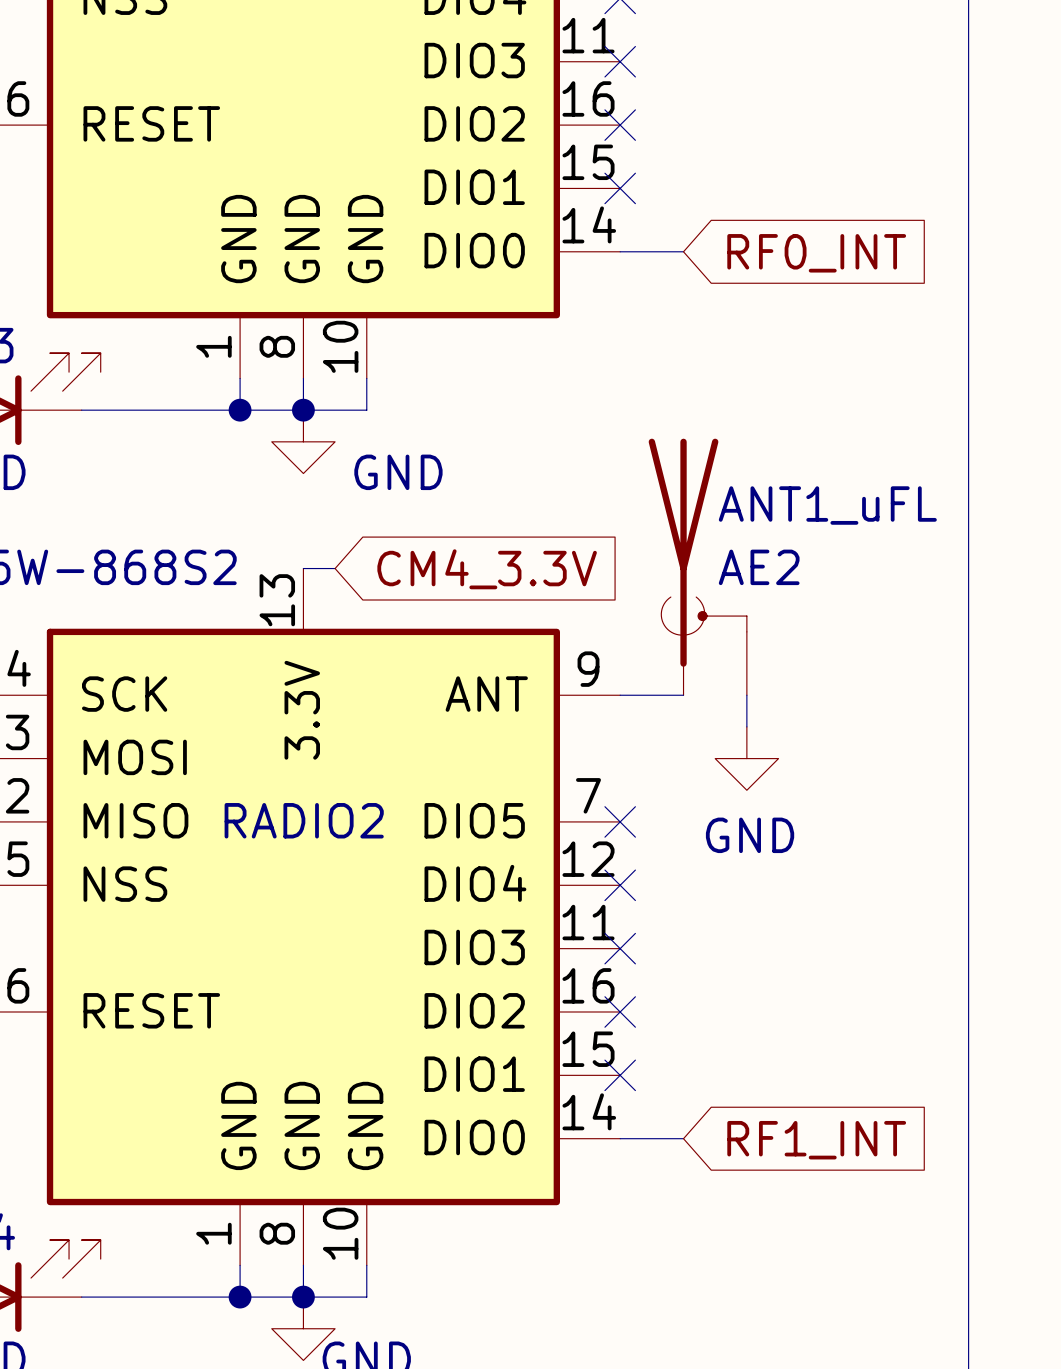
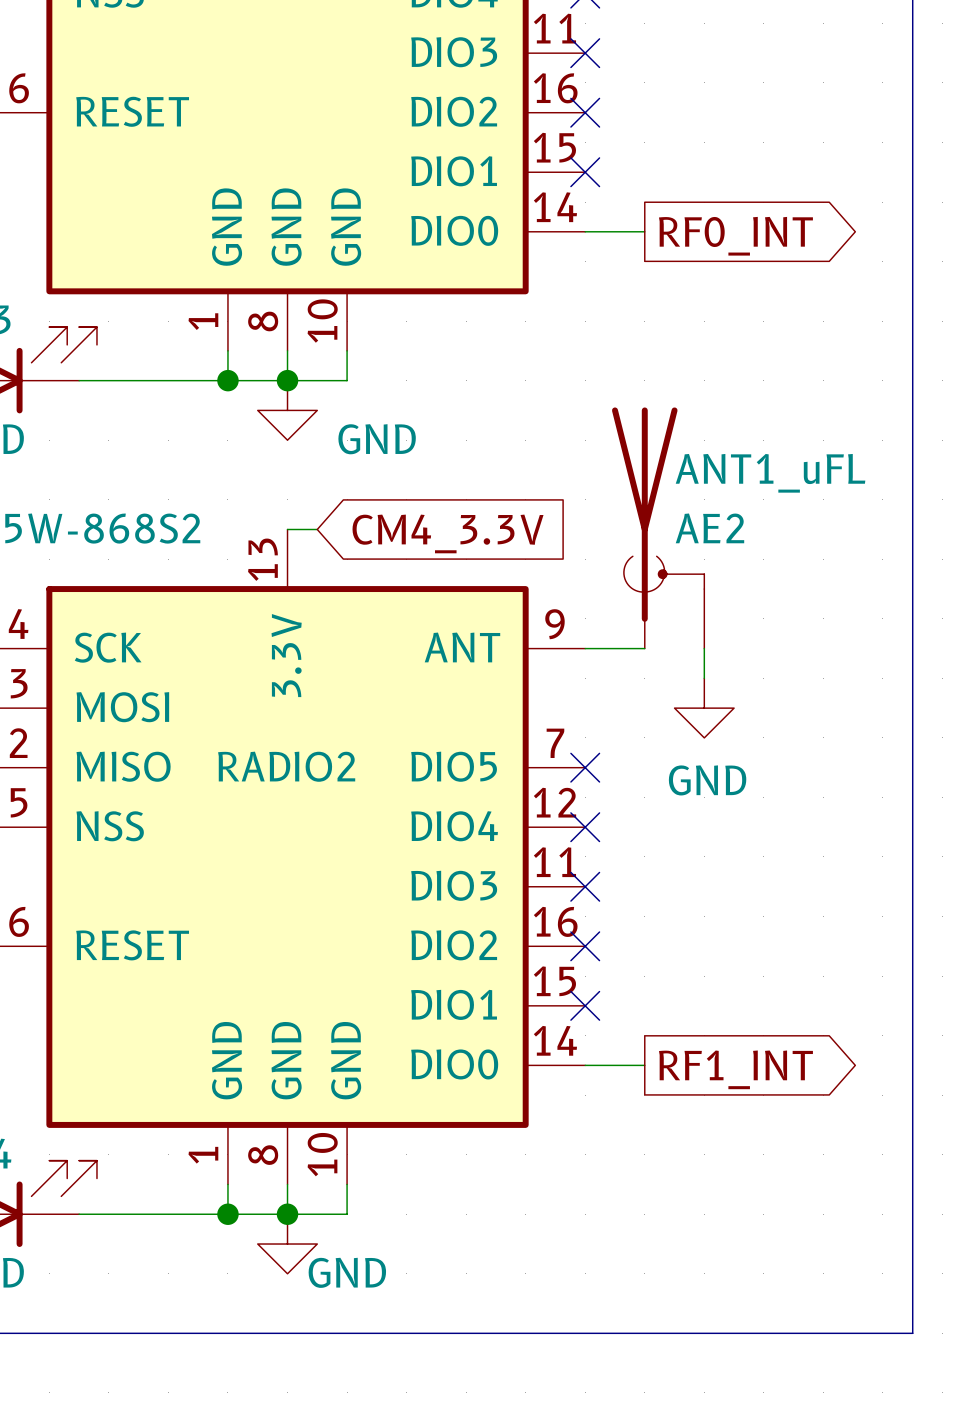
global label shape: input (816, 253) -> output (735, 236)
global label shape: input (816, 1140) -> output (735, 1069)

